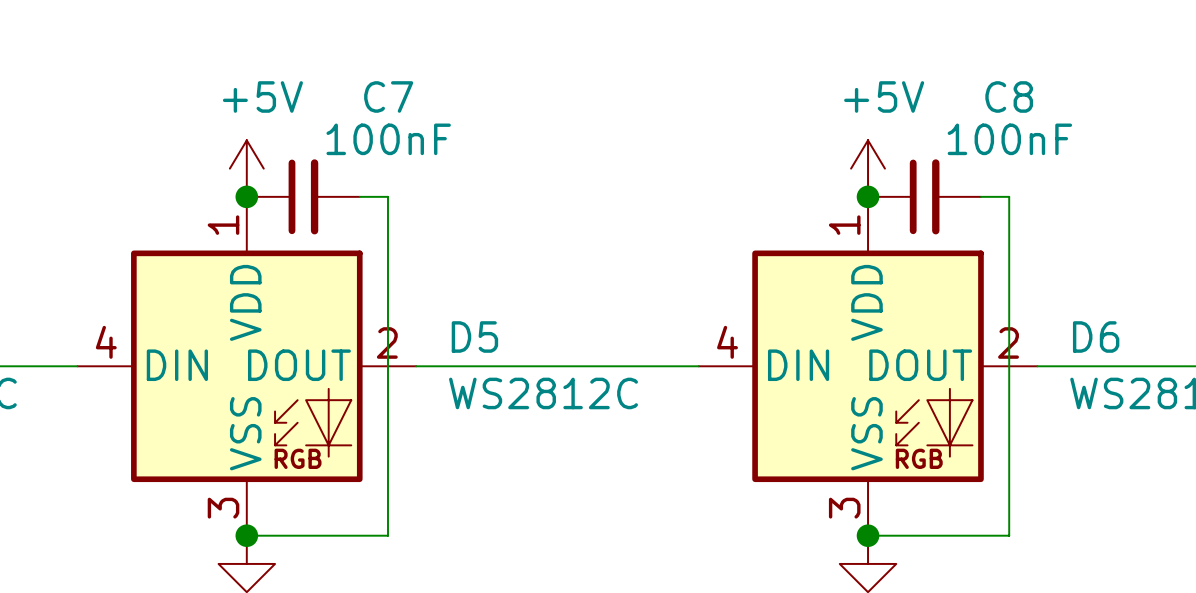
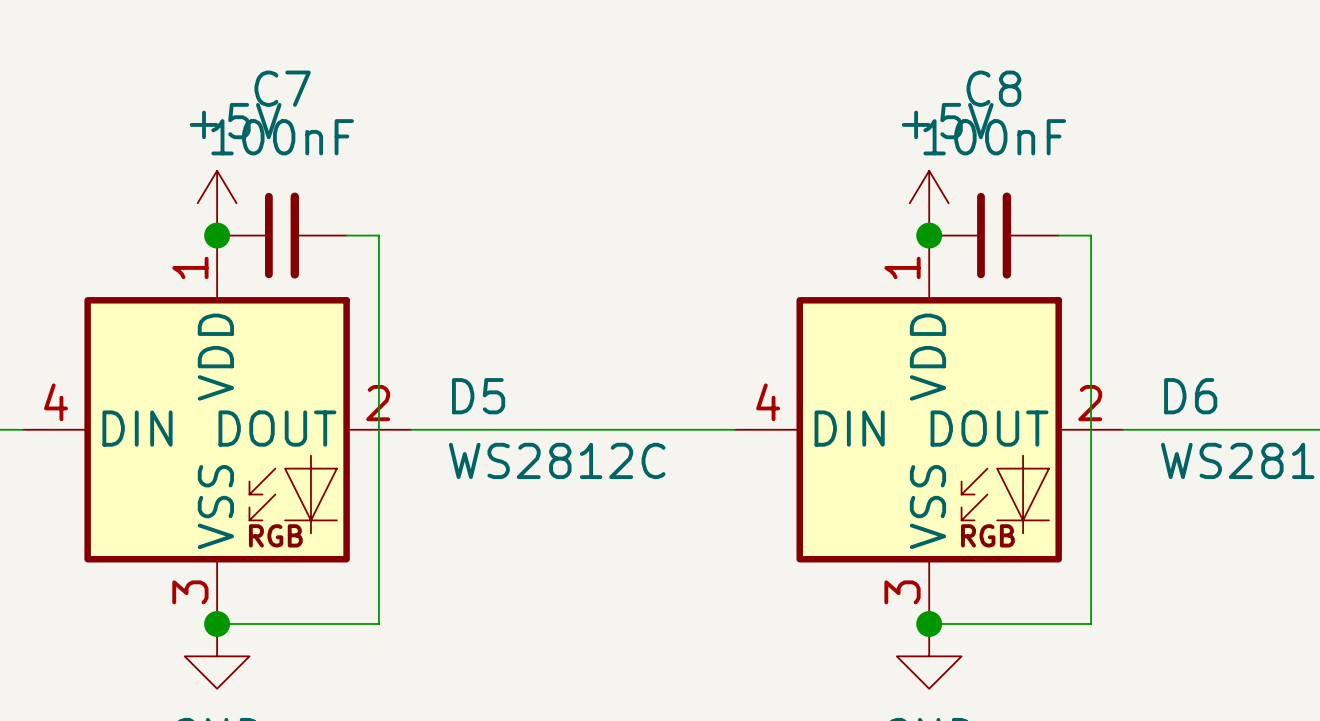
C7 name position: C7 (388, 96) -> C7 (282, 88)
C8 name position: C8 (1009, 96) -> C8 (993, 88)
C7 value position: 100nF (388, 139) -> 100nF (282, 137)
C8 value position: 100nF (1009, 139) -> 100nF (994, 137)

